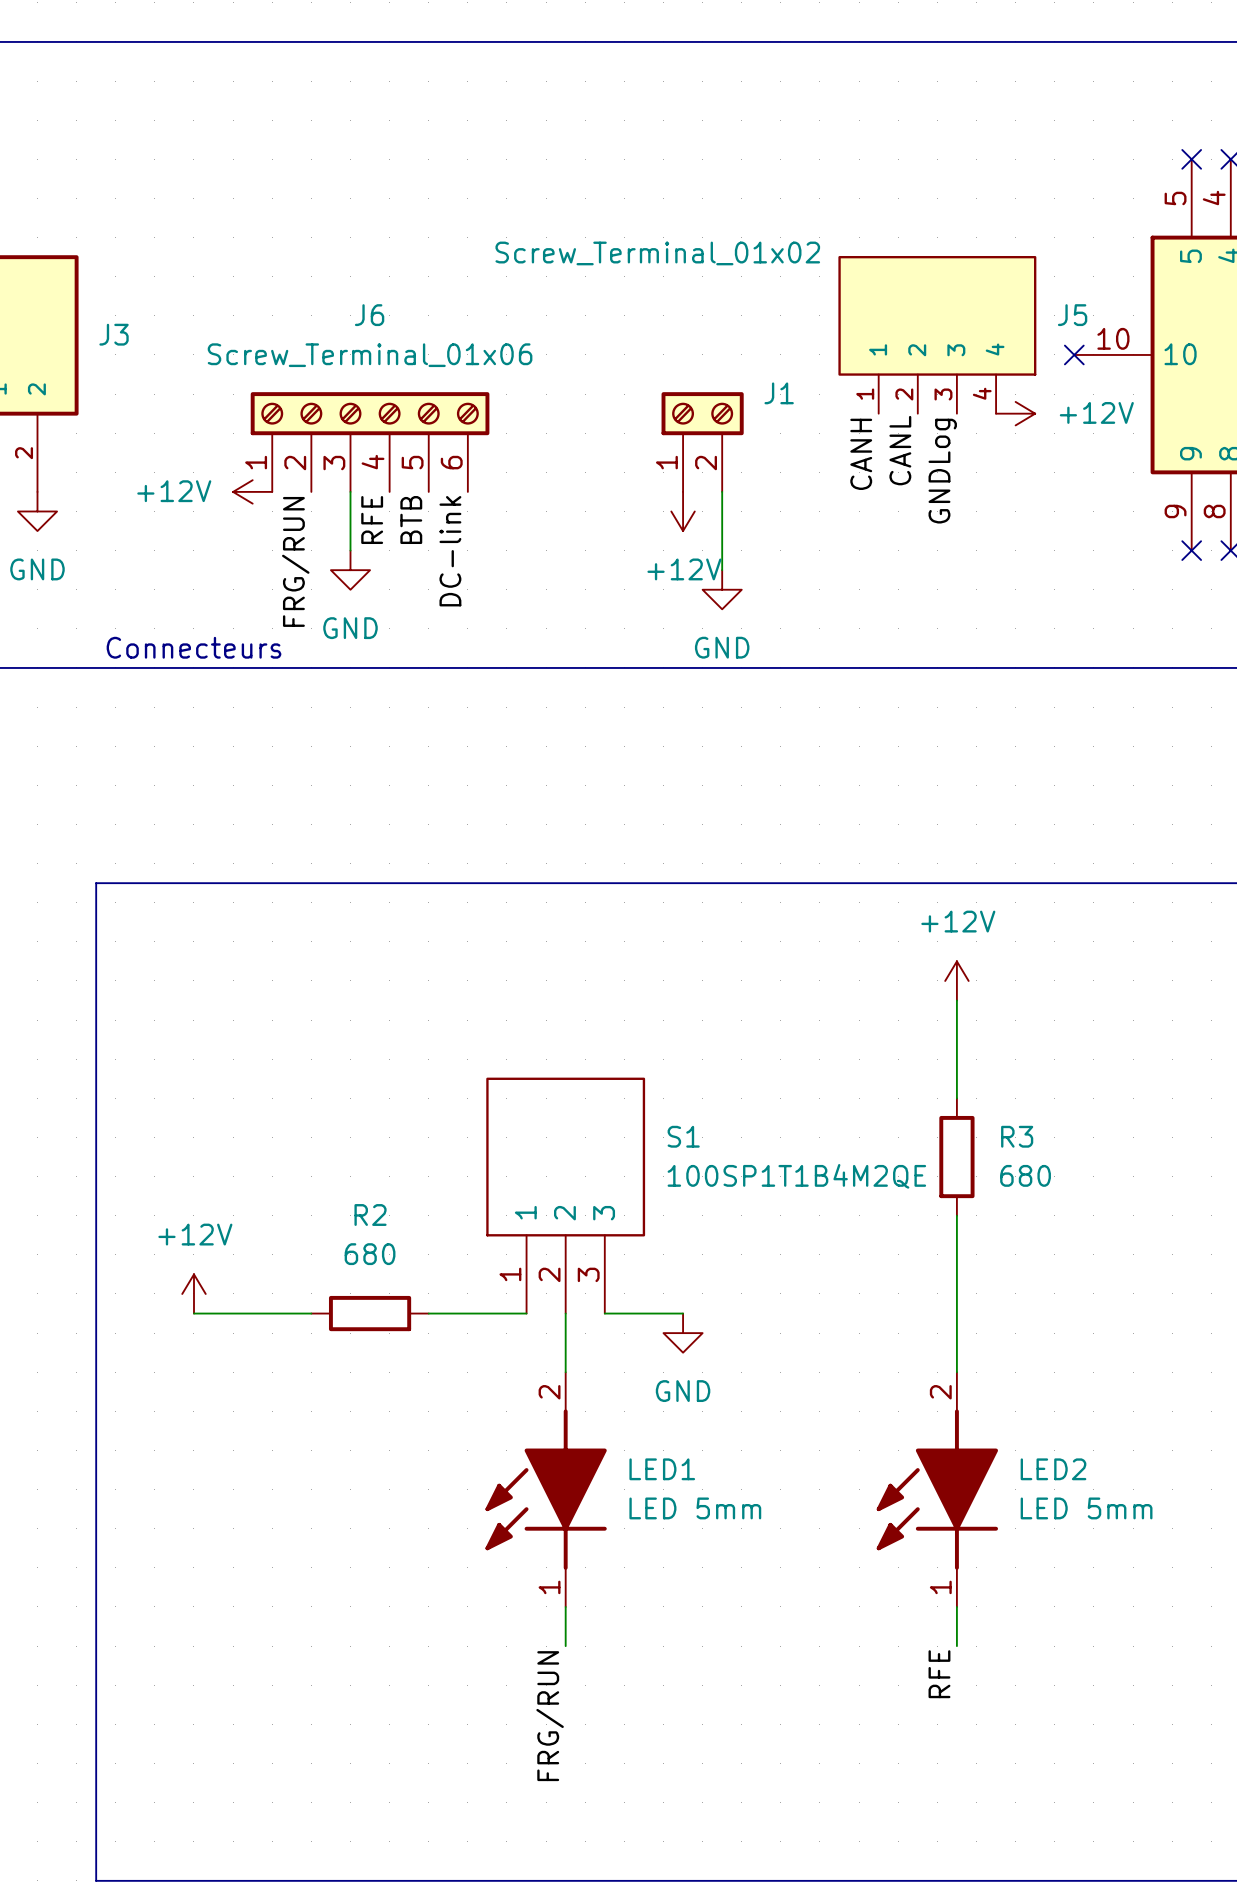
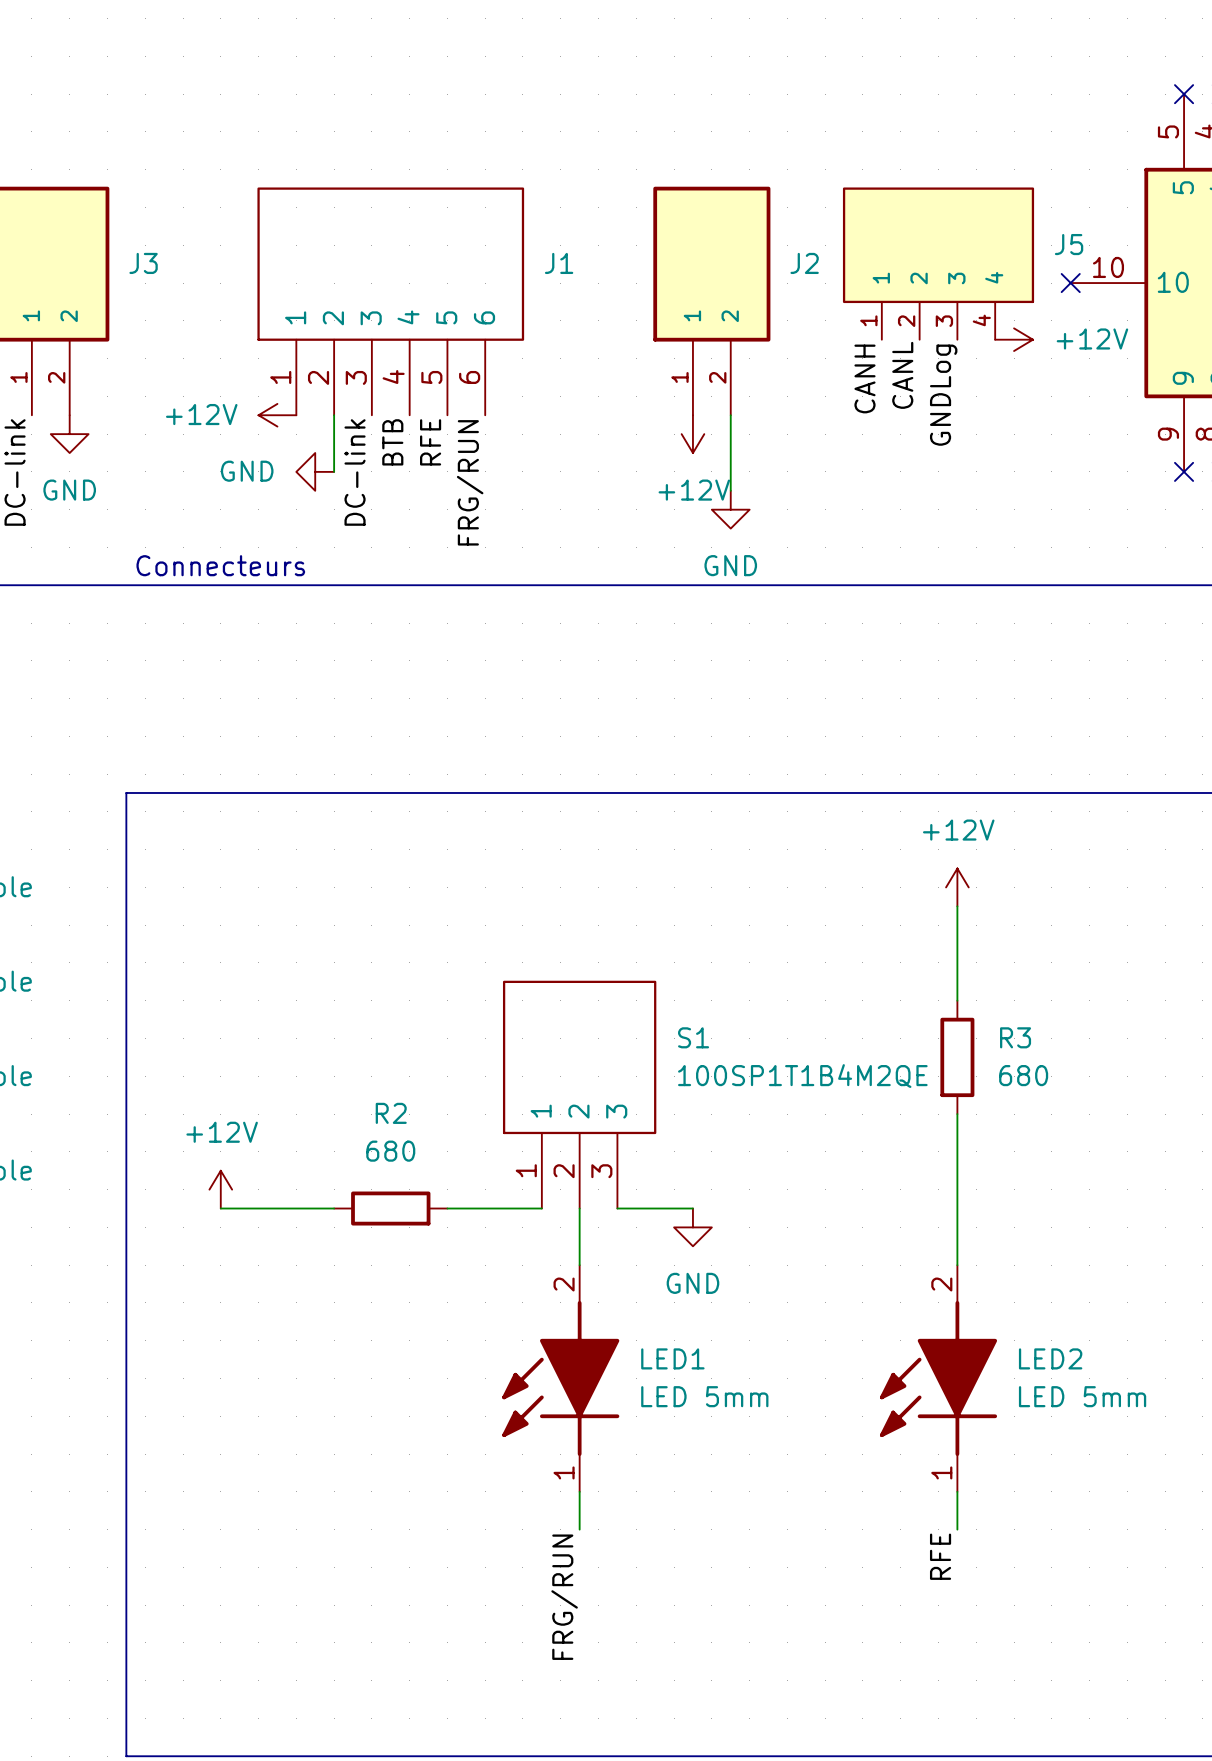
J1 value: Screw_Terminal_01x02 (657, 253) -> none
J2: none -> (711, 300)
J1 symbol: [661, 392, 744, 492] -> [257, 187, 525, 416]
J1 name position: J1 (779, 393) -> J1 (559, 263)
J6: Screw_Terminal_01x06 (370, 442) -> none
wire: (350, 491) (350, 550) -> (334, 415) (334, 471)
label: RFE (372, 520) -> BTB (392, 442)
label: BTB (411, 520) -> RFE (430, 442)
label: none -> DC-link (355, 472)
label: DC-link (450, 551) -> FRG/RUN (470, 482)
label: FRG/RUN (295, 561) -> none
power symbol rotation: 0° (350, 570) -> 90° clockwise (315, 471)
power symbol position: GND (350, 570) -> GND (315, 471)

